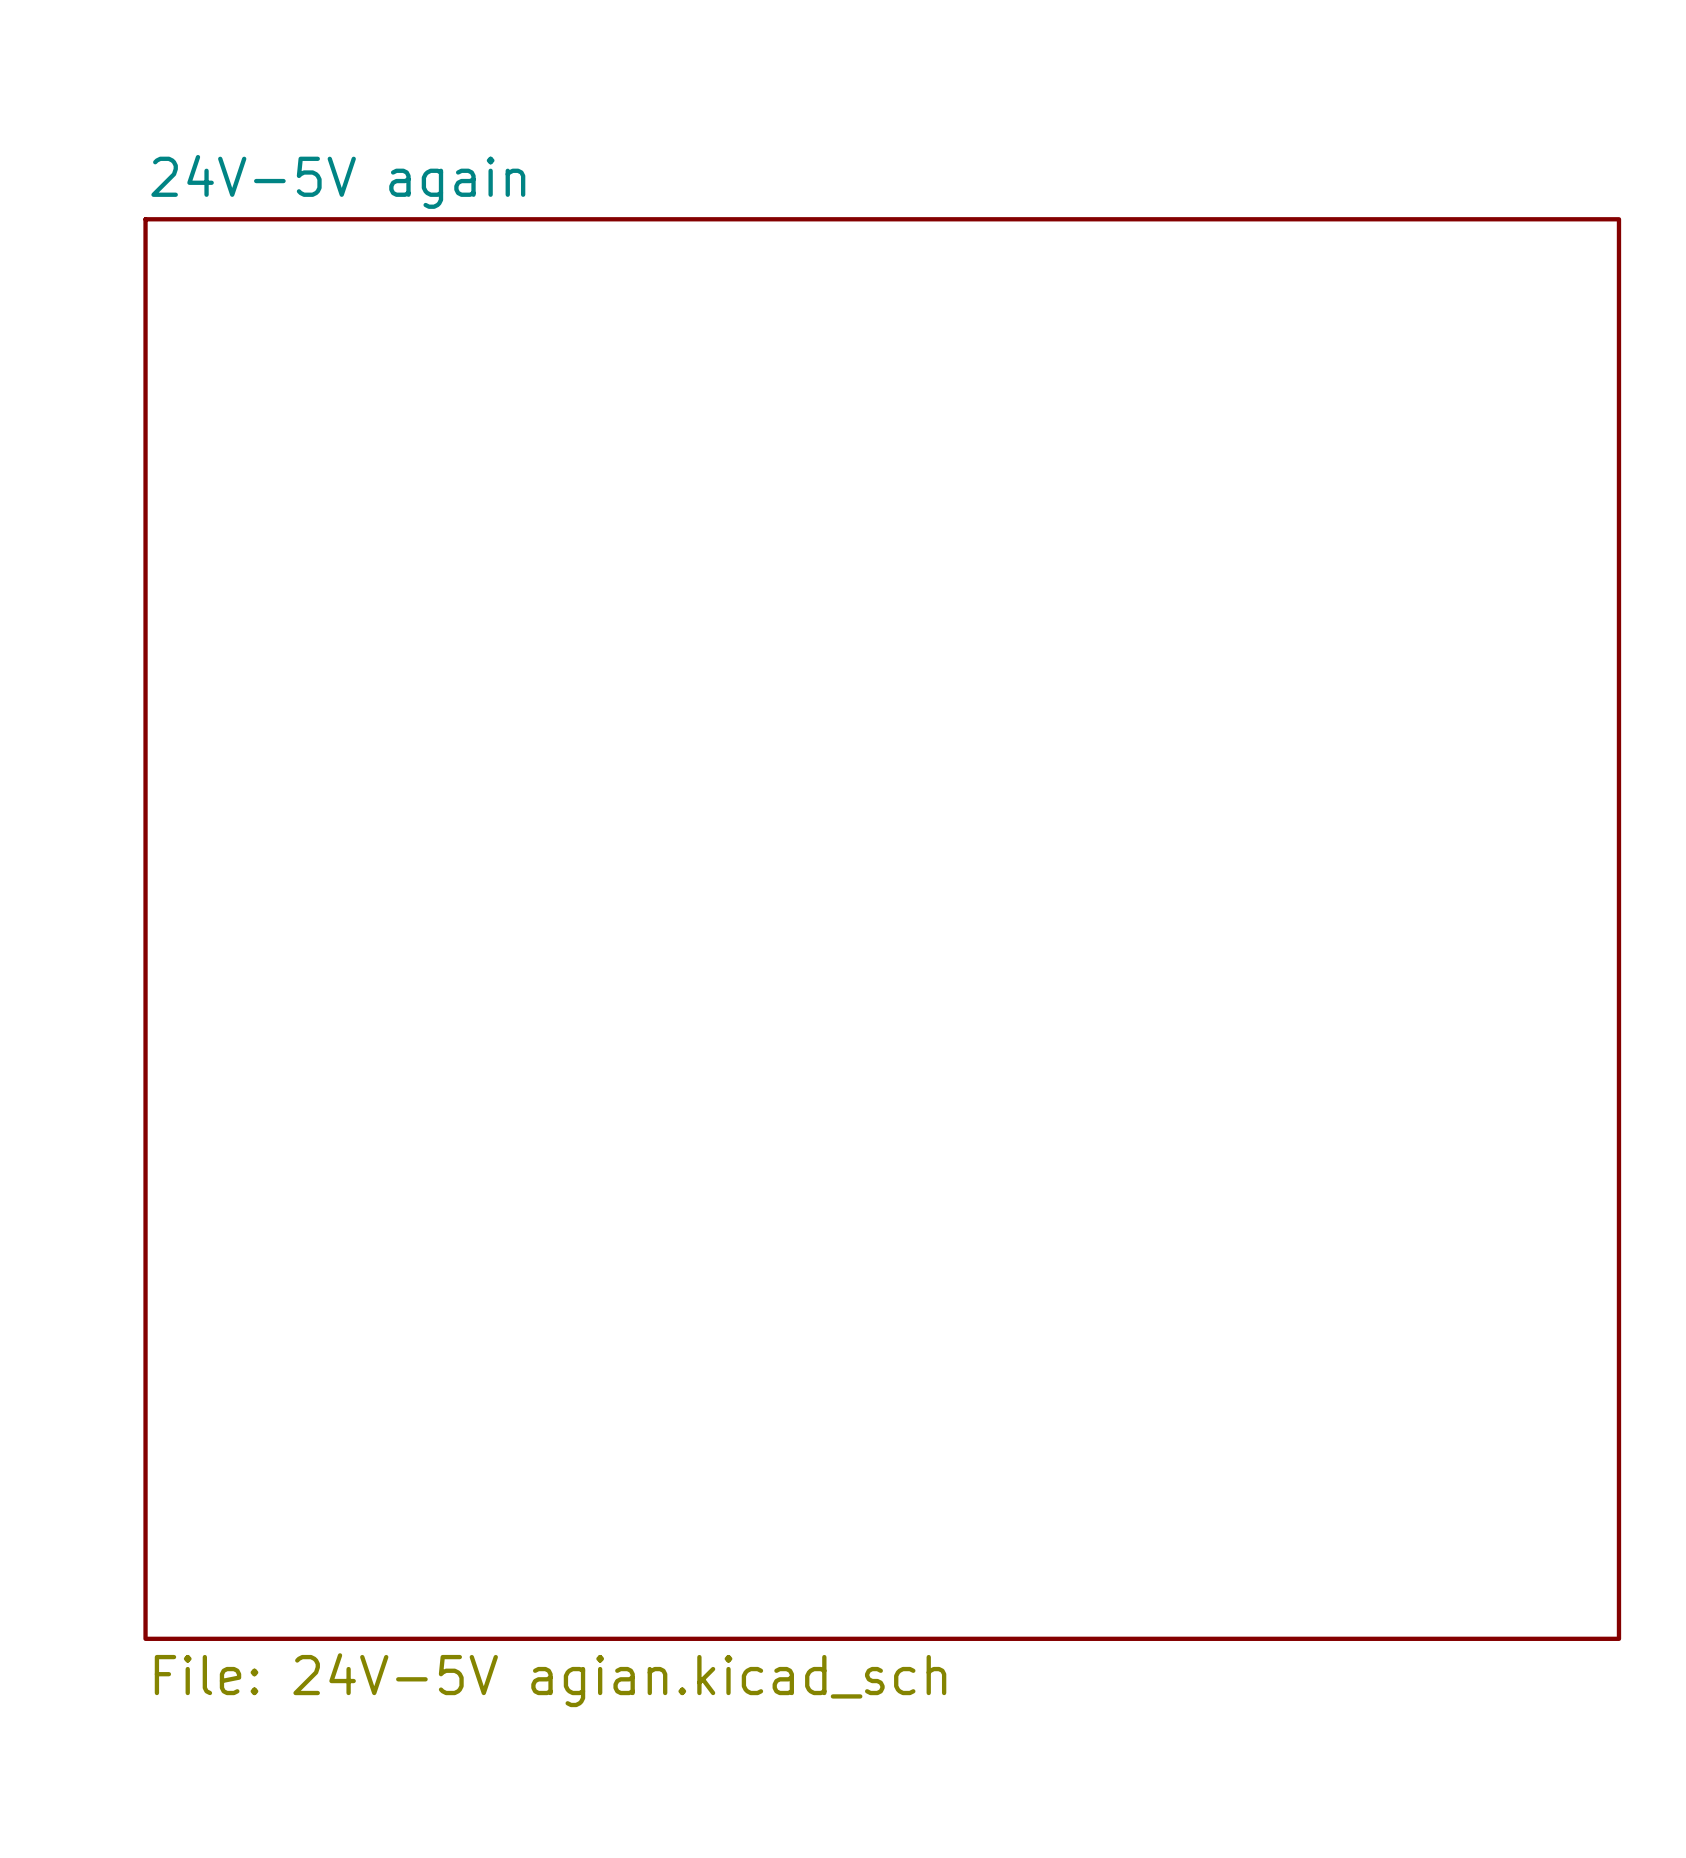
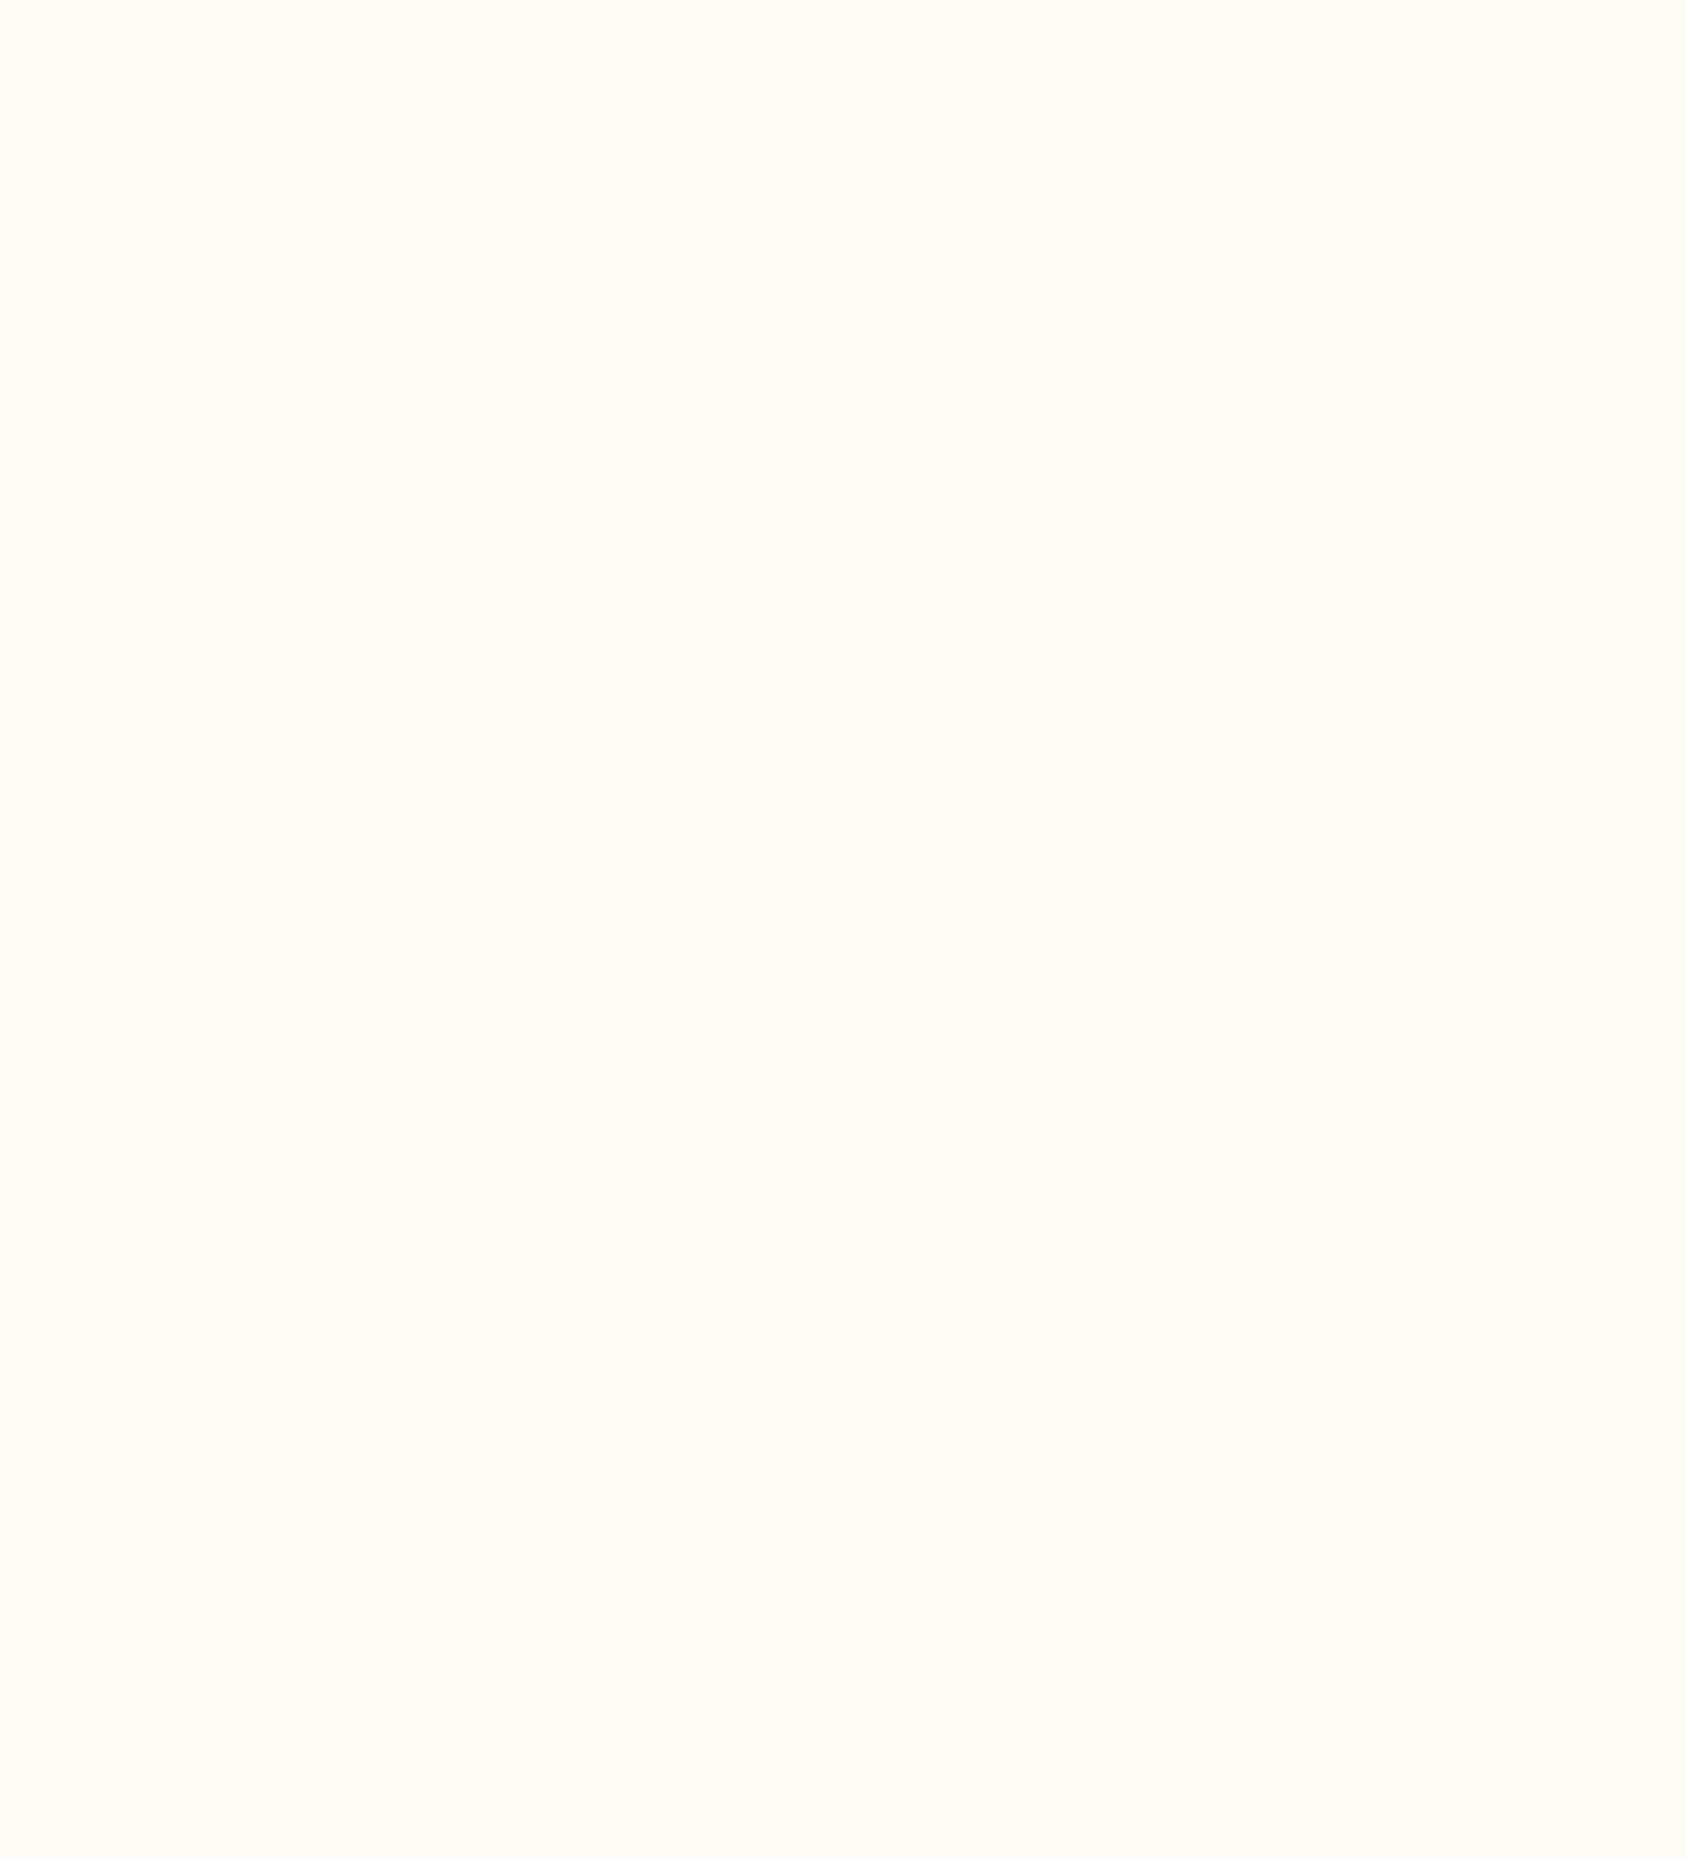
sheet 24V-5V again: File: 24V-5V agian.kicad_sch (882, 929) -> none

